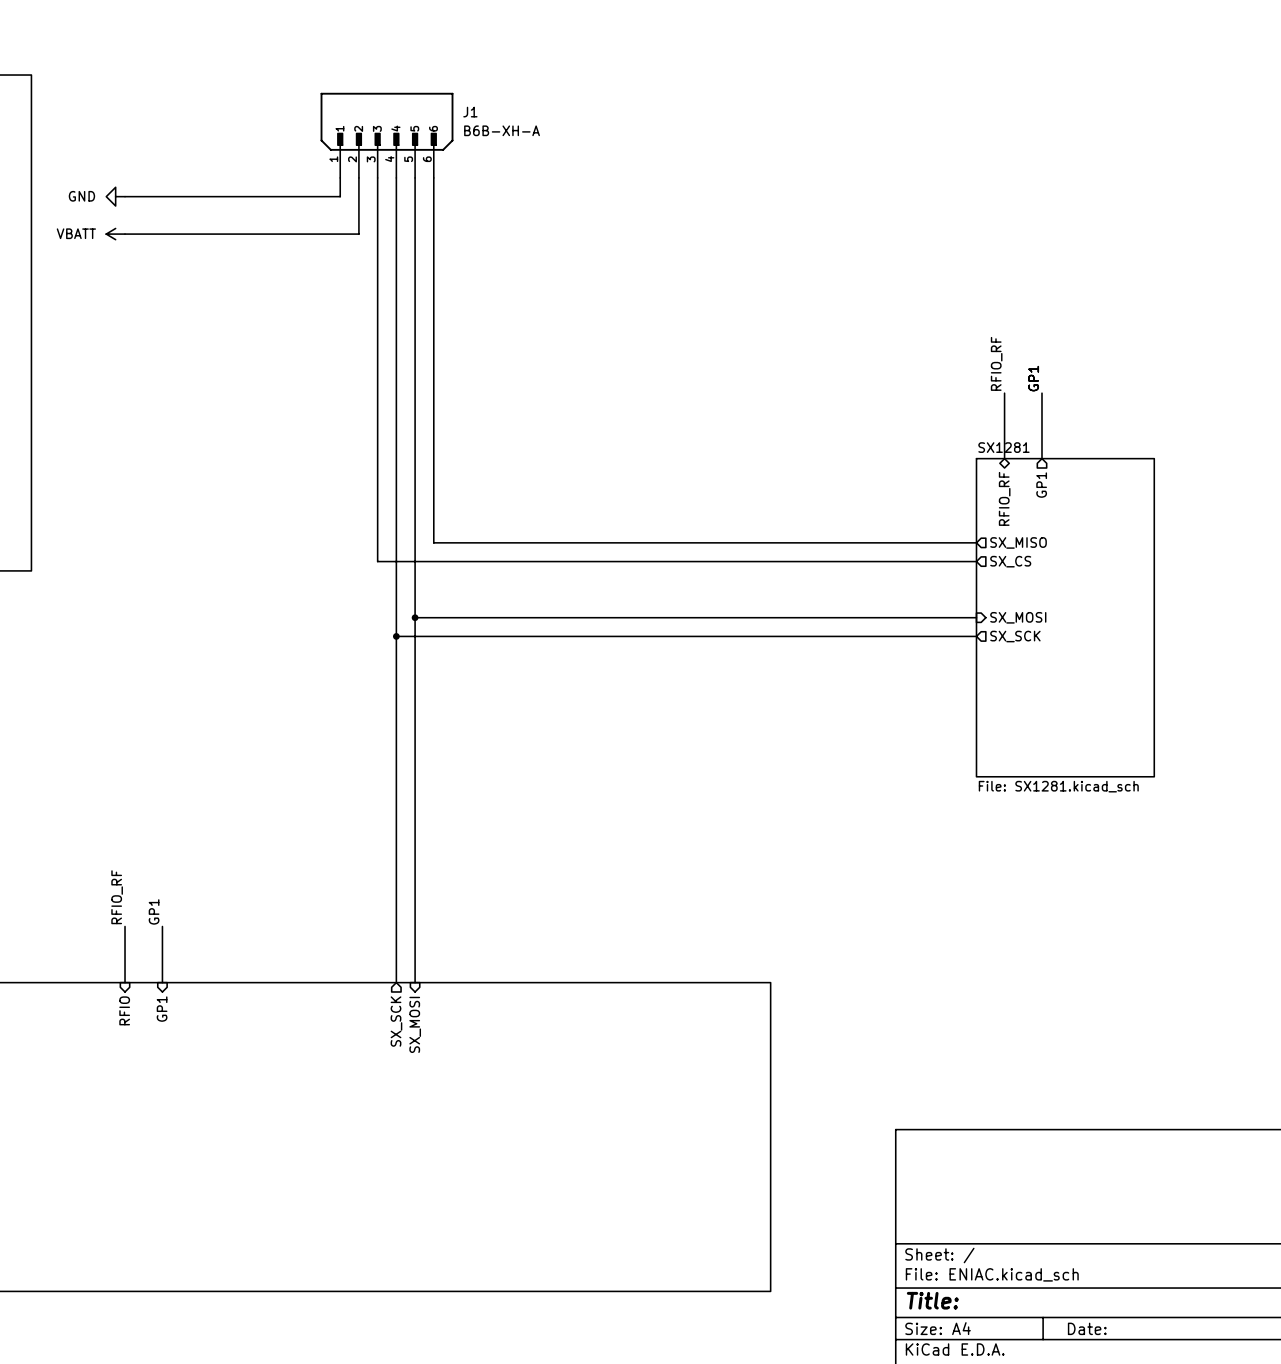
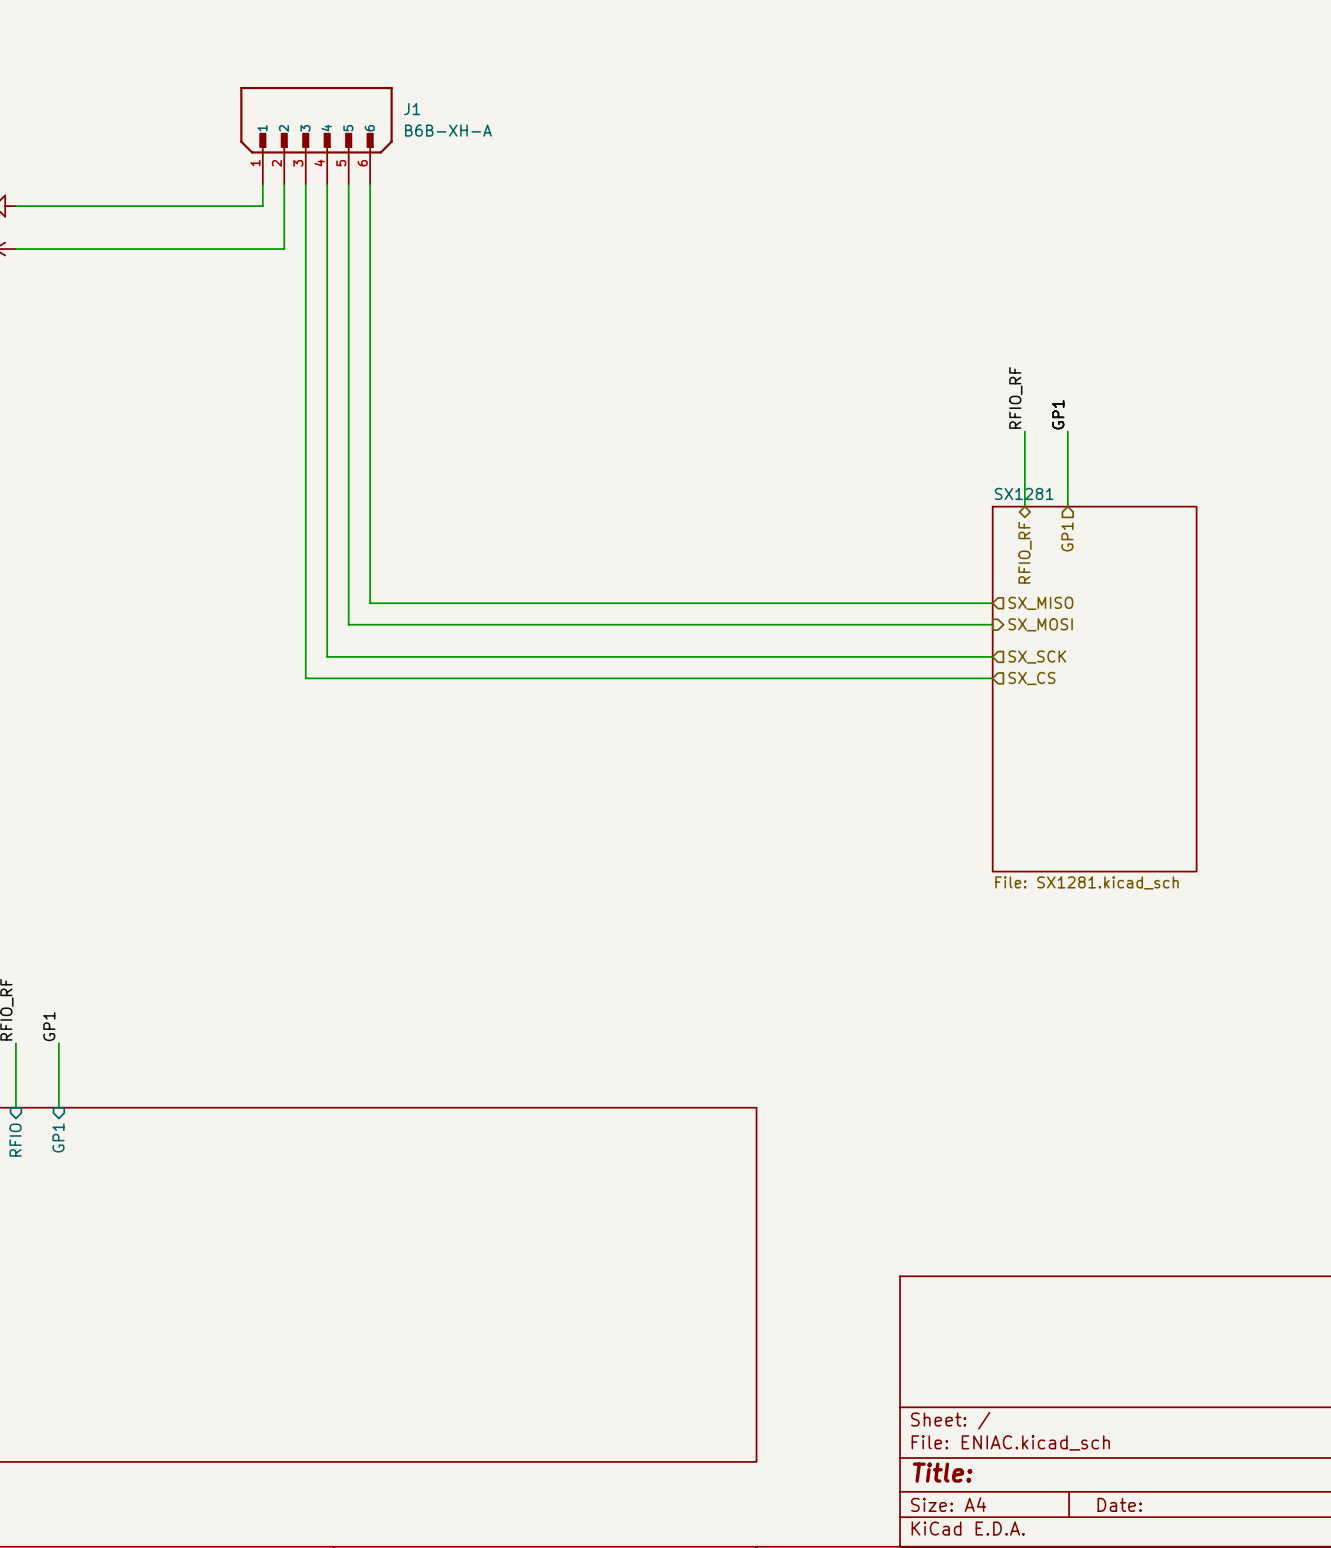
wire: (377, 561) (415, 561) (415, 982) -> (305, 624) (305, 678) (992, 678)
hierarchical label shape: input (1010, 561) -> output (1040, 624)
hierarchical label: SX_CS (1010, 561) -> SX_MOSI (1040, 624)
wire: (396, 589) (396, 982) -> (327, 656) (992, 656)
wire: (415, 617) (976, 617) -> none
junction: (415, 617) -> none
hierarchical label shape: output (1018, 617) -> input (1031, 678)
hierarchical label: SX_MOSI (1018, 617) -> SX_CS (1031, 678)
wire: (396, 636) (976, 636) -> none
junction: (396, 636) -> none
hierarchical label position: SX_SCK (1015, 636) -> SX_SCK (1037, 657)
hierarchical label: SX_SCK (396, 1021) -> none
hierarchical label: SX_MOSI (415, 1024) -> none

